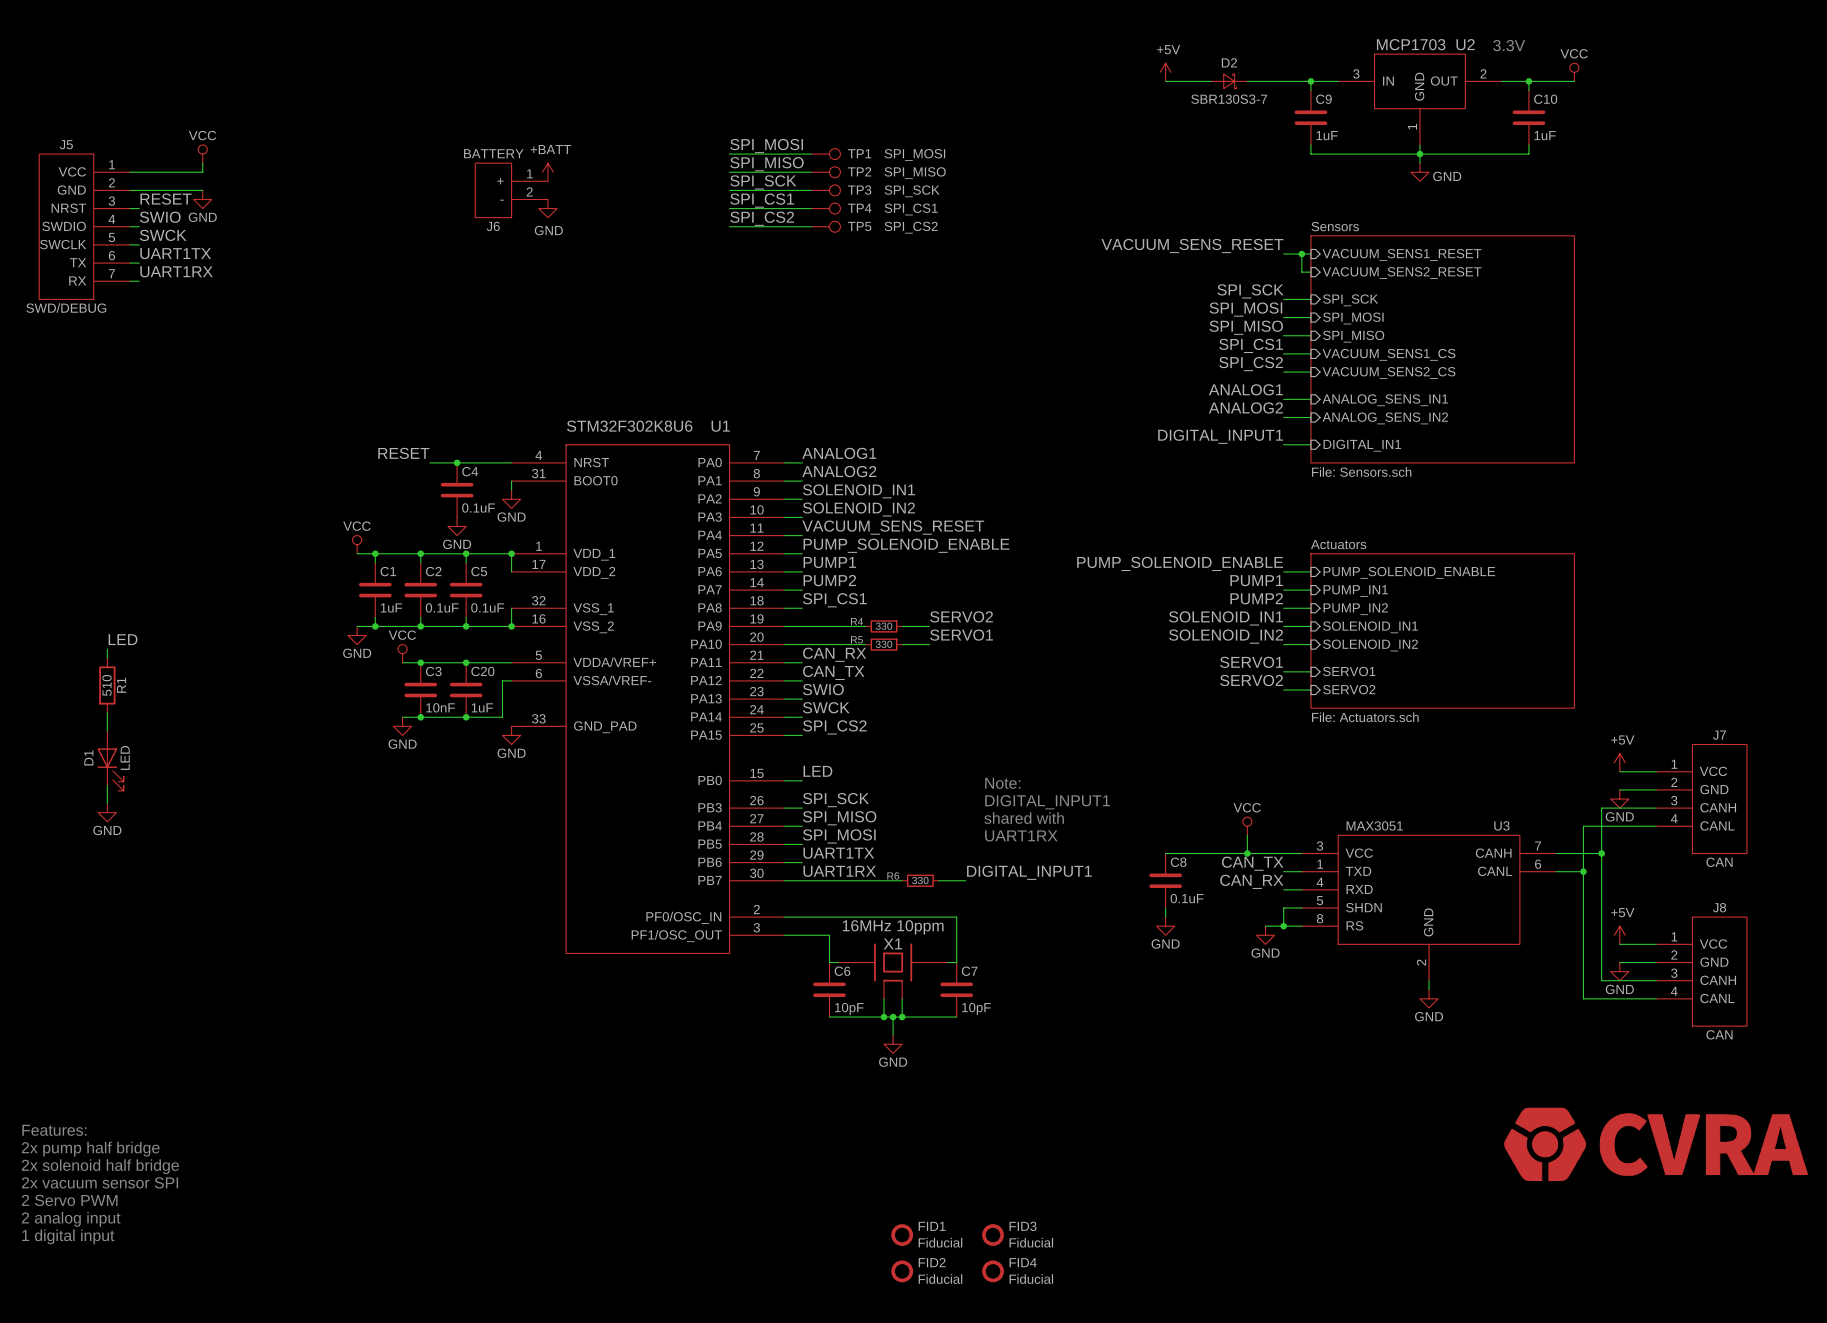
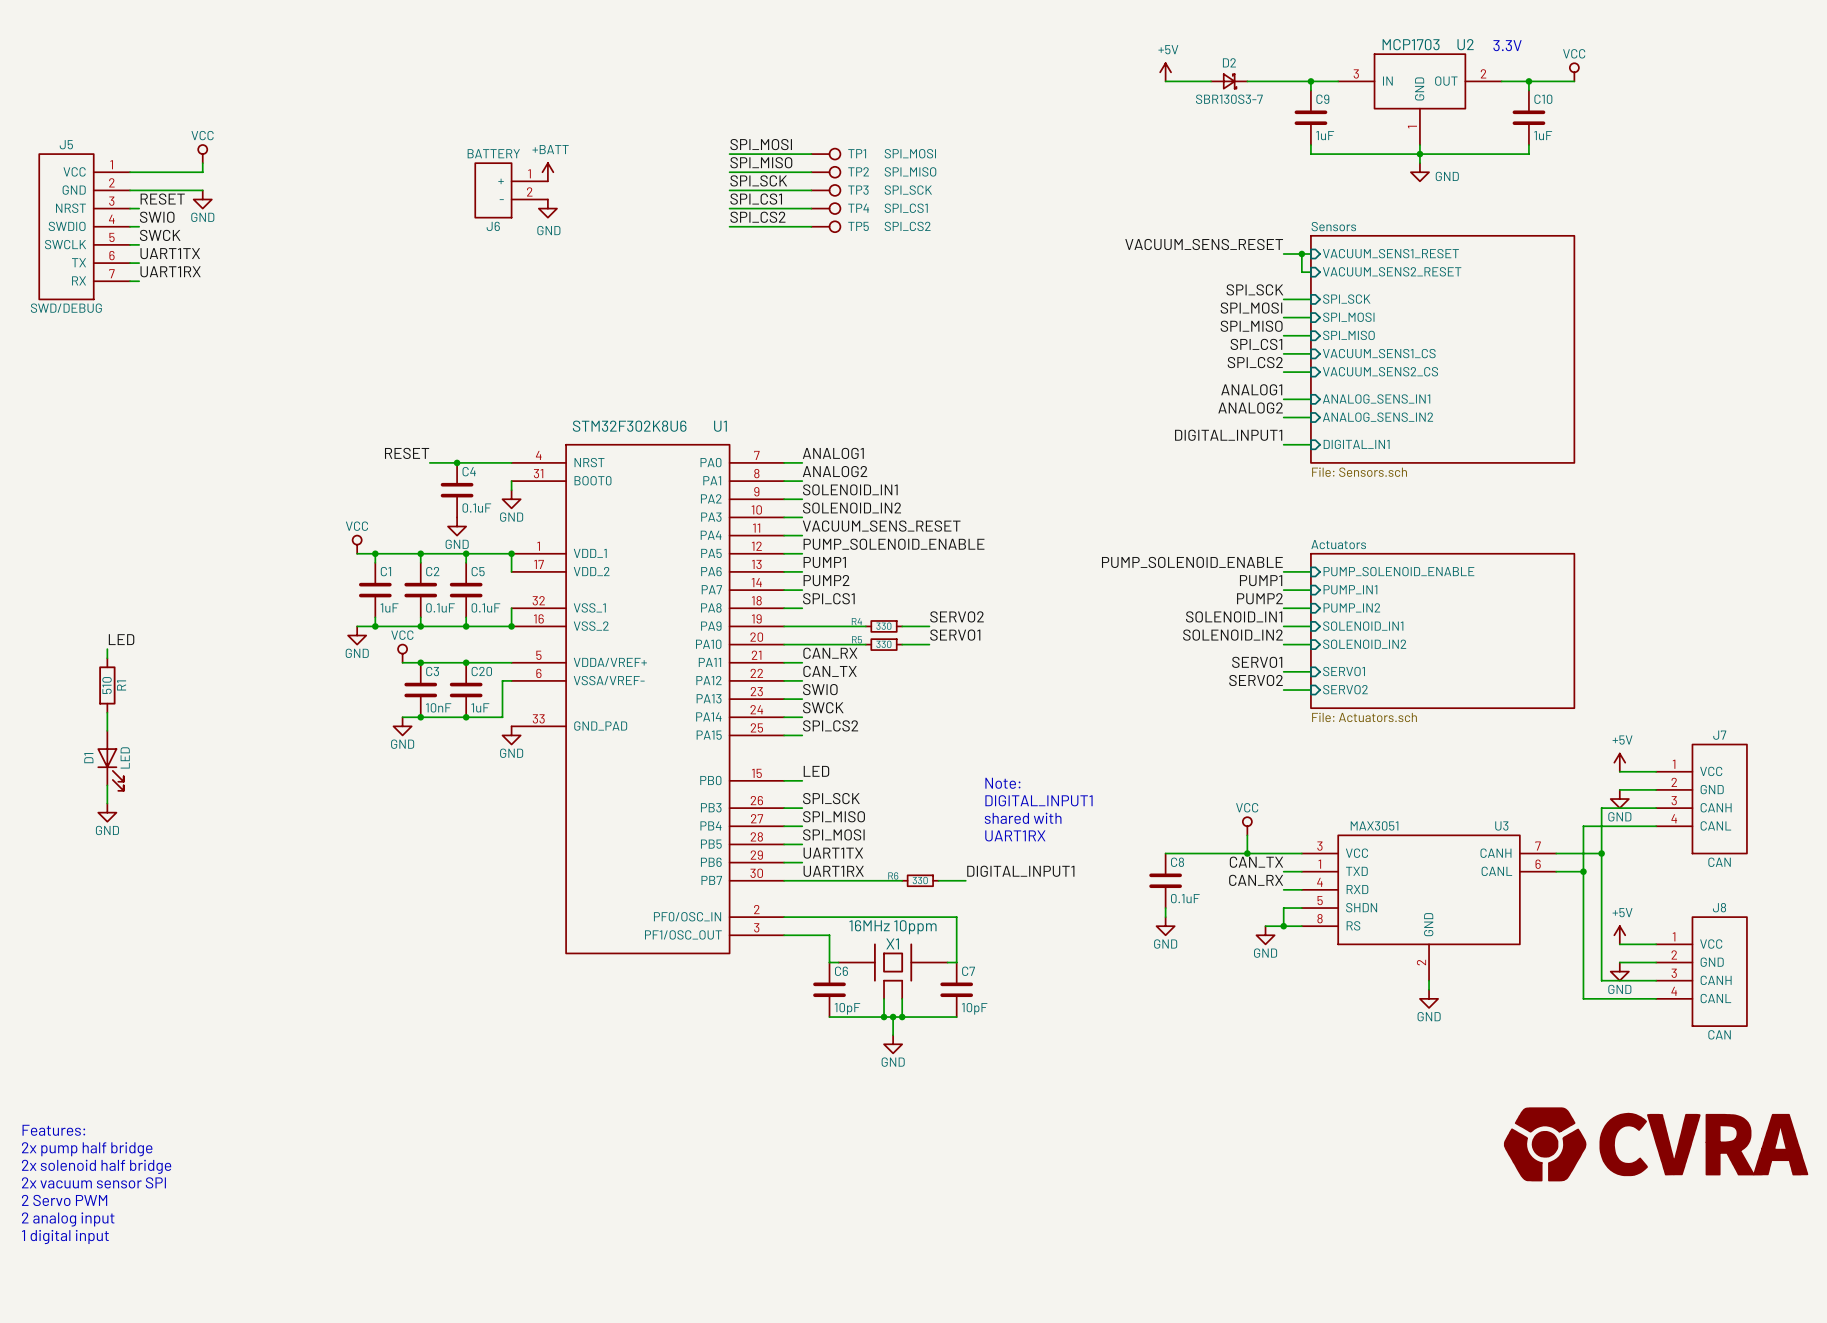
FID1: Fiducial (902, 1235) -> none
FID3: Fiducial (993, 1235) -> none
FID2: Fiducial (902, 1271) -> none
FID4: Fiducial (993, 1271) -> none

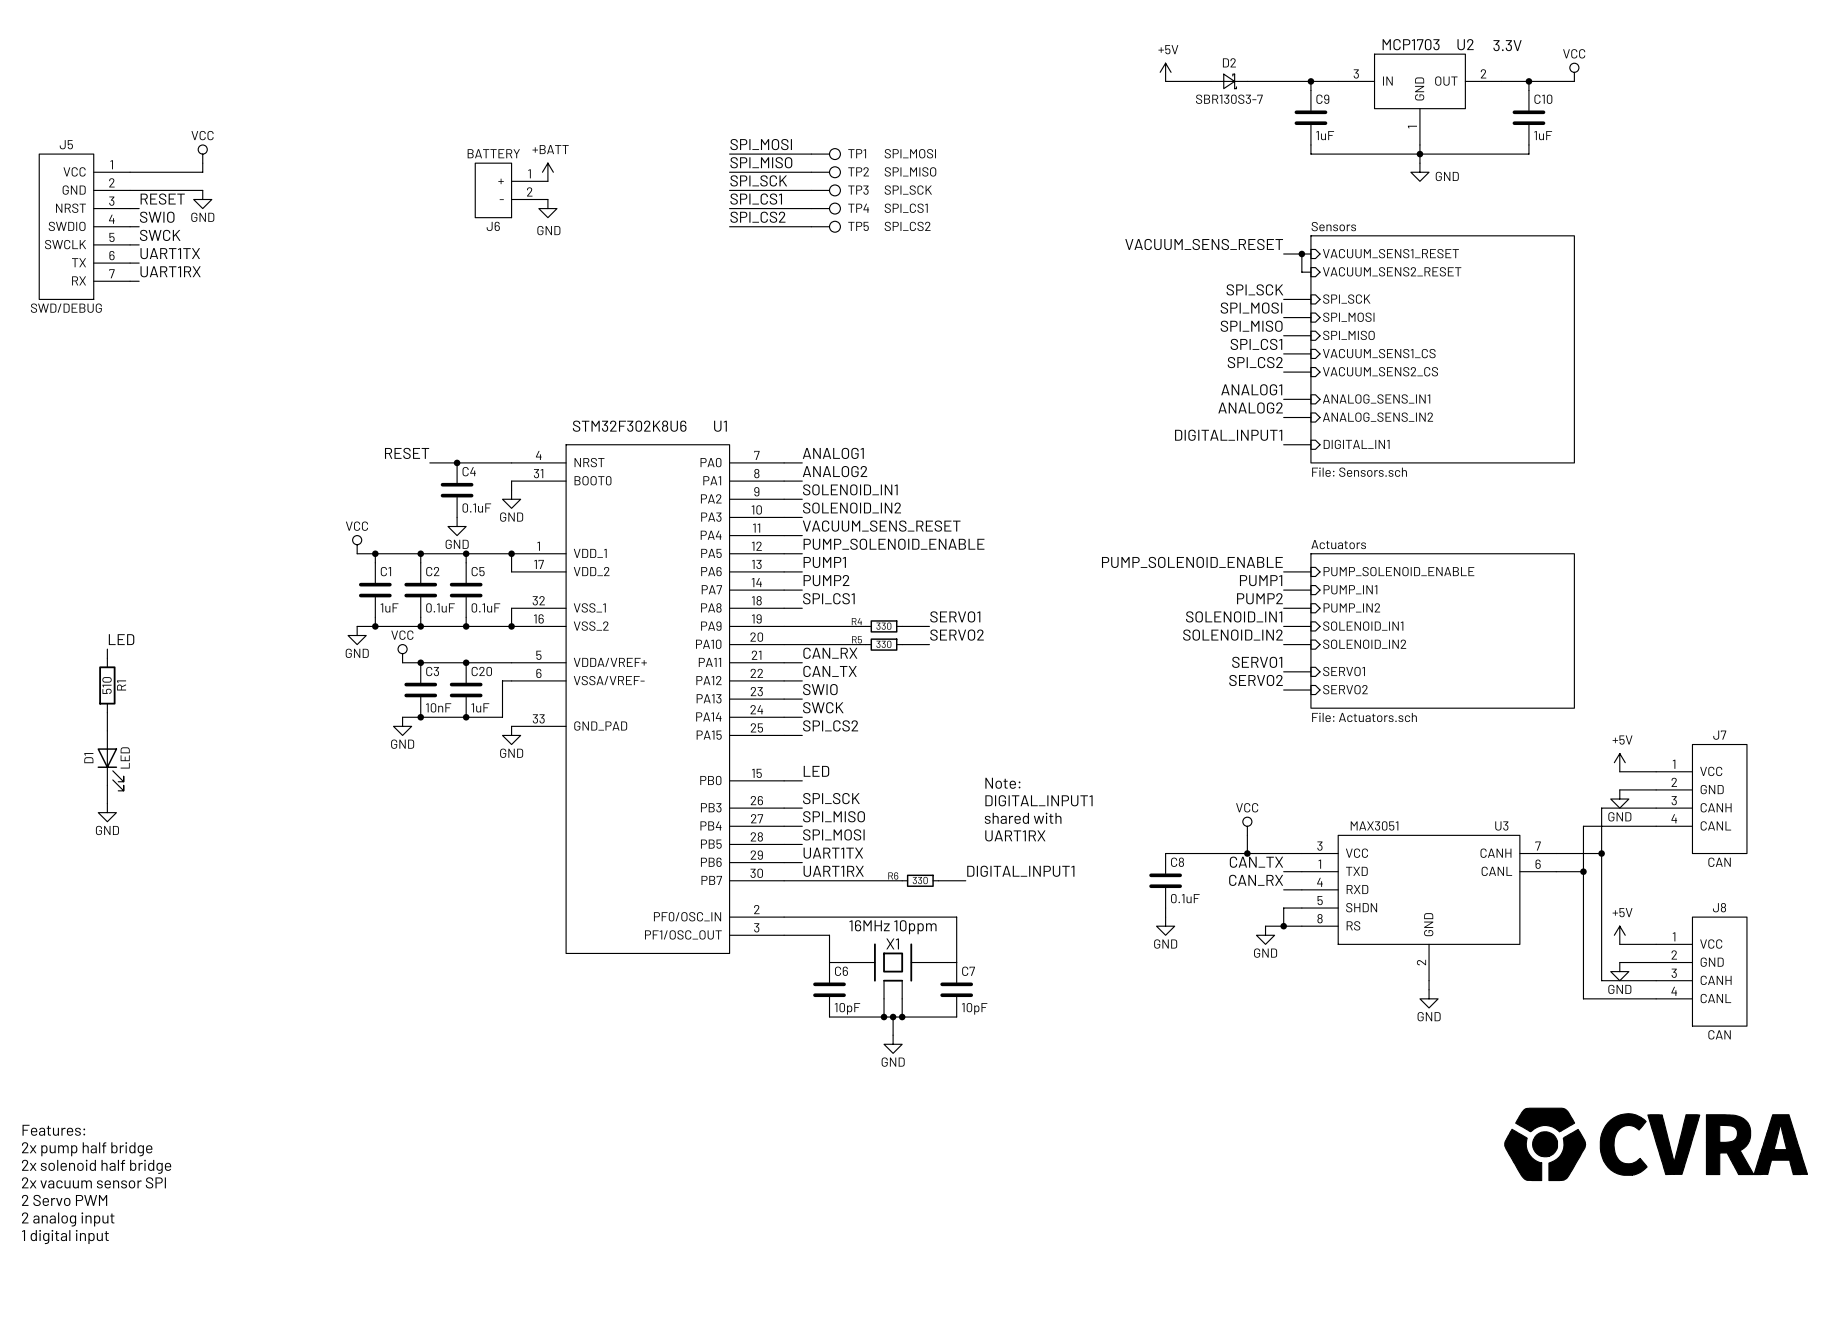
label: SERVO2 (957, 616) -> SERVO1 (955, 616)
label: SERVO1 (955, 635) -> SERVO2 (957, 635)

